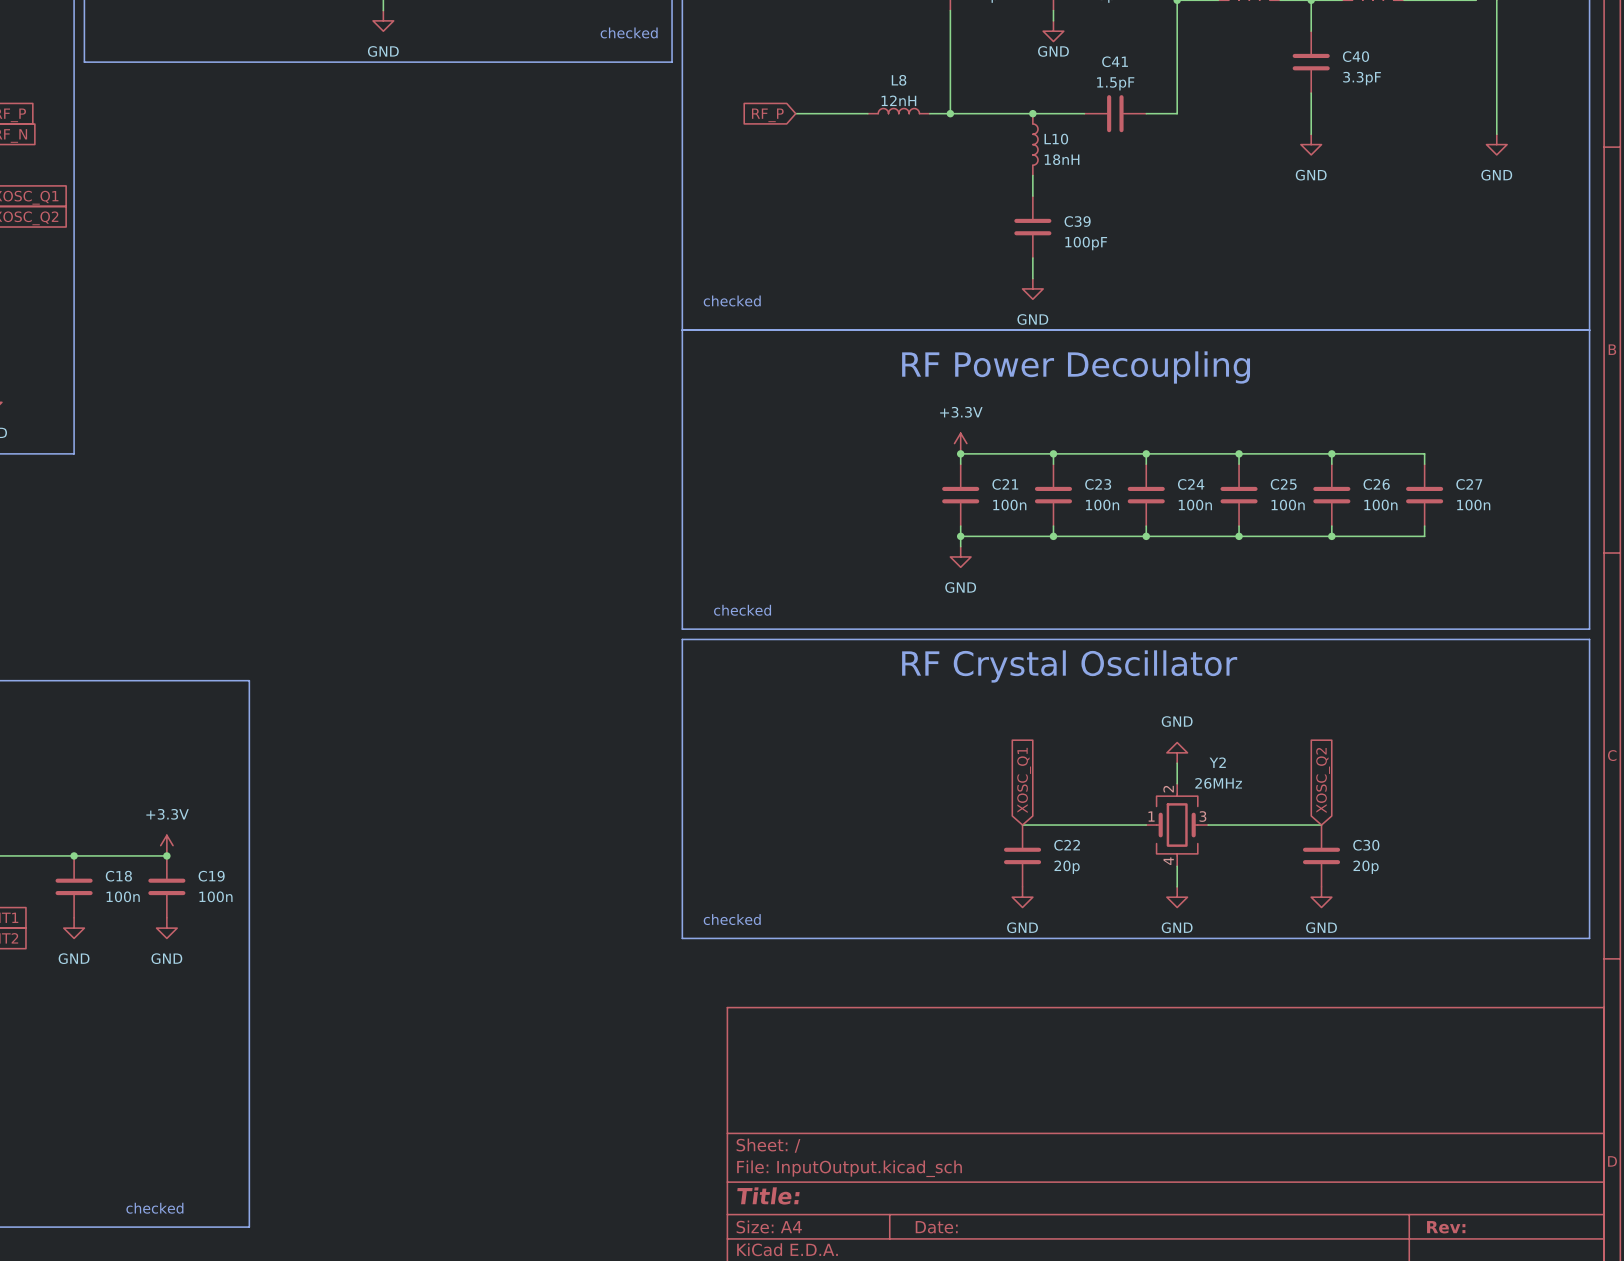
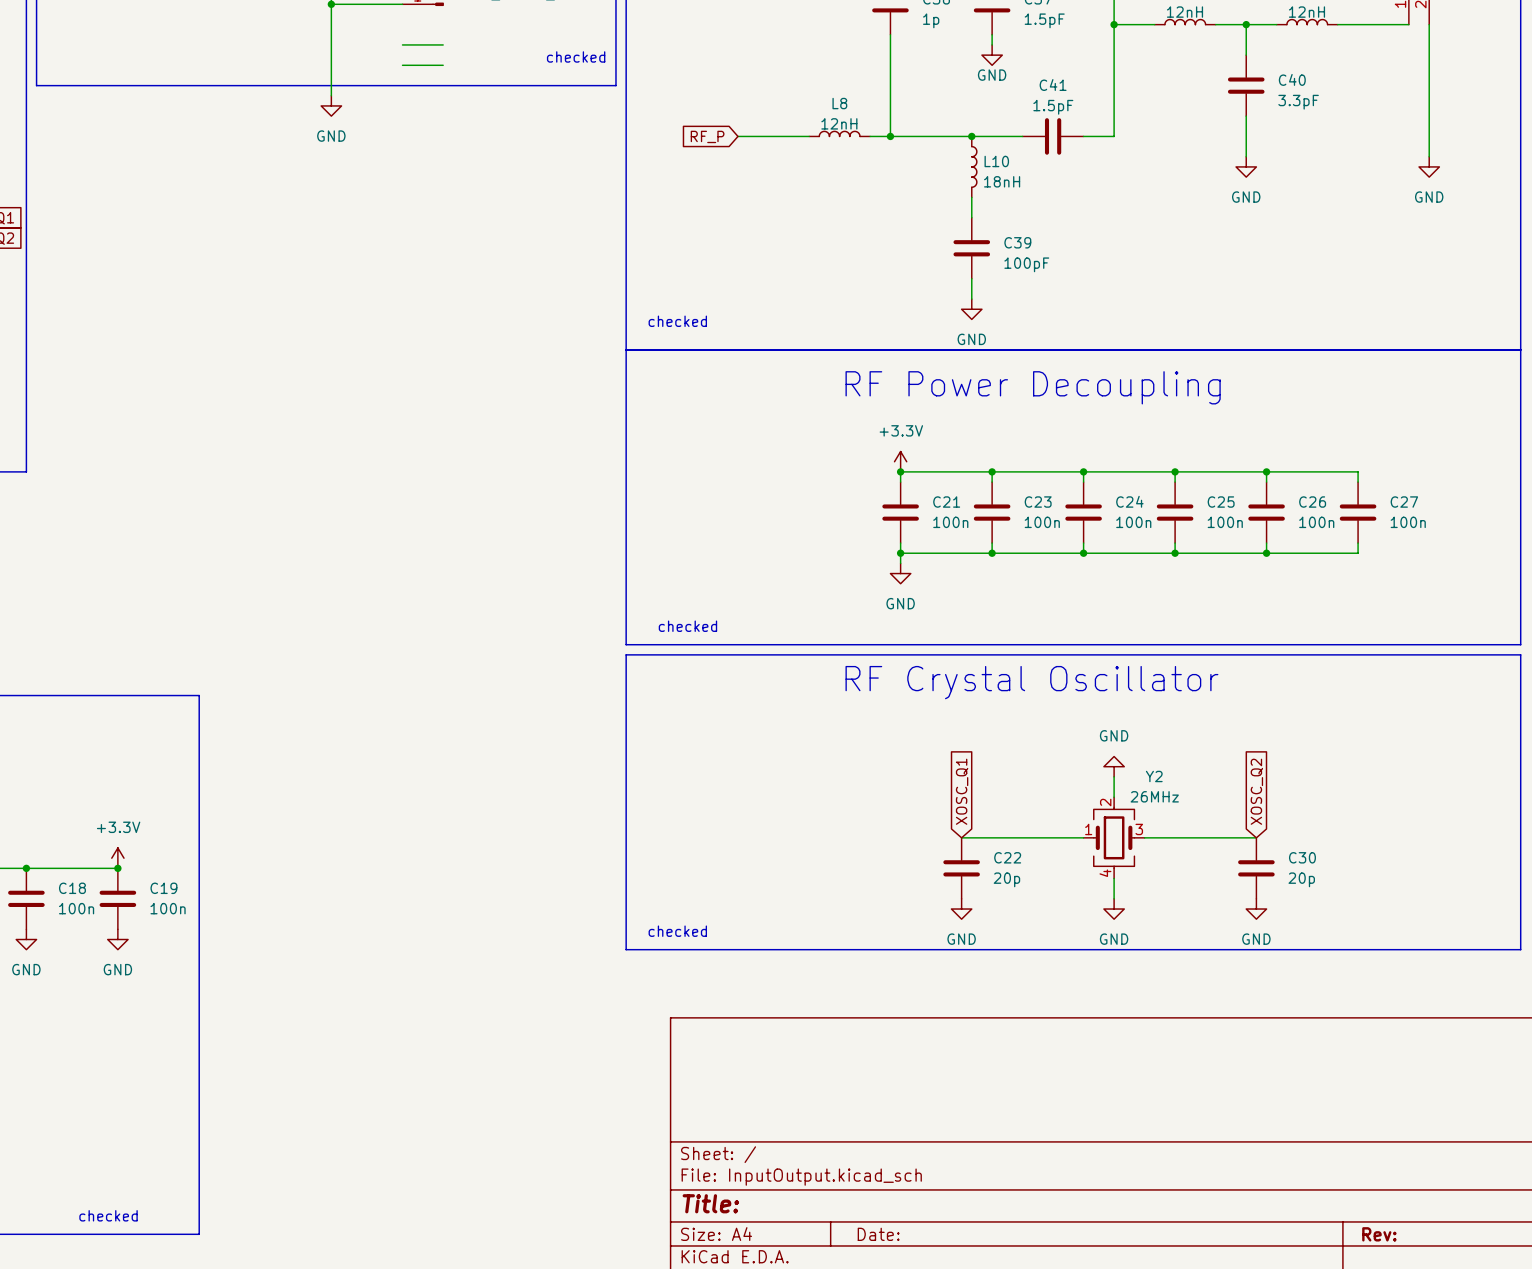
wire: none -> (331, 34) (331, 95)
power symbol position: GND (383, 20) -> GND (331, 105)
wire: none -> (402, 44) (443, 44)
wire: none -> (402, 65) (443, 65)

